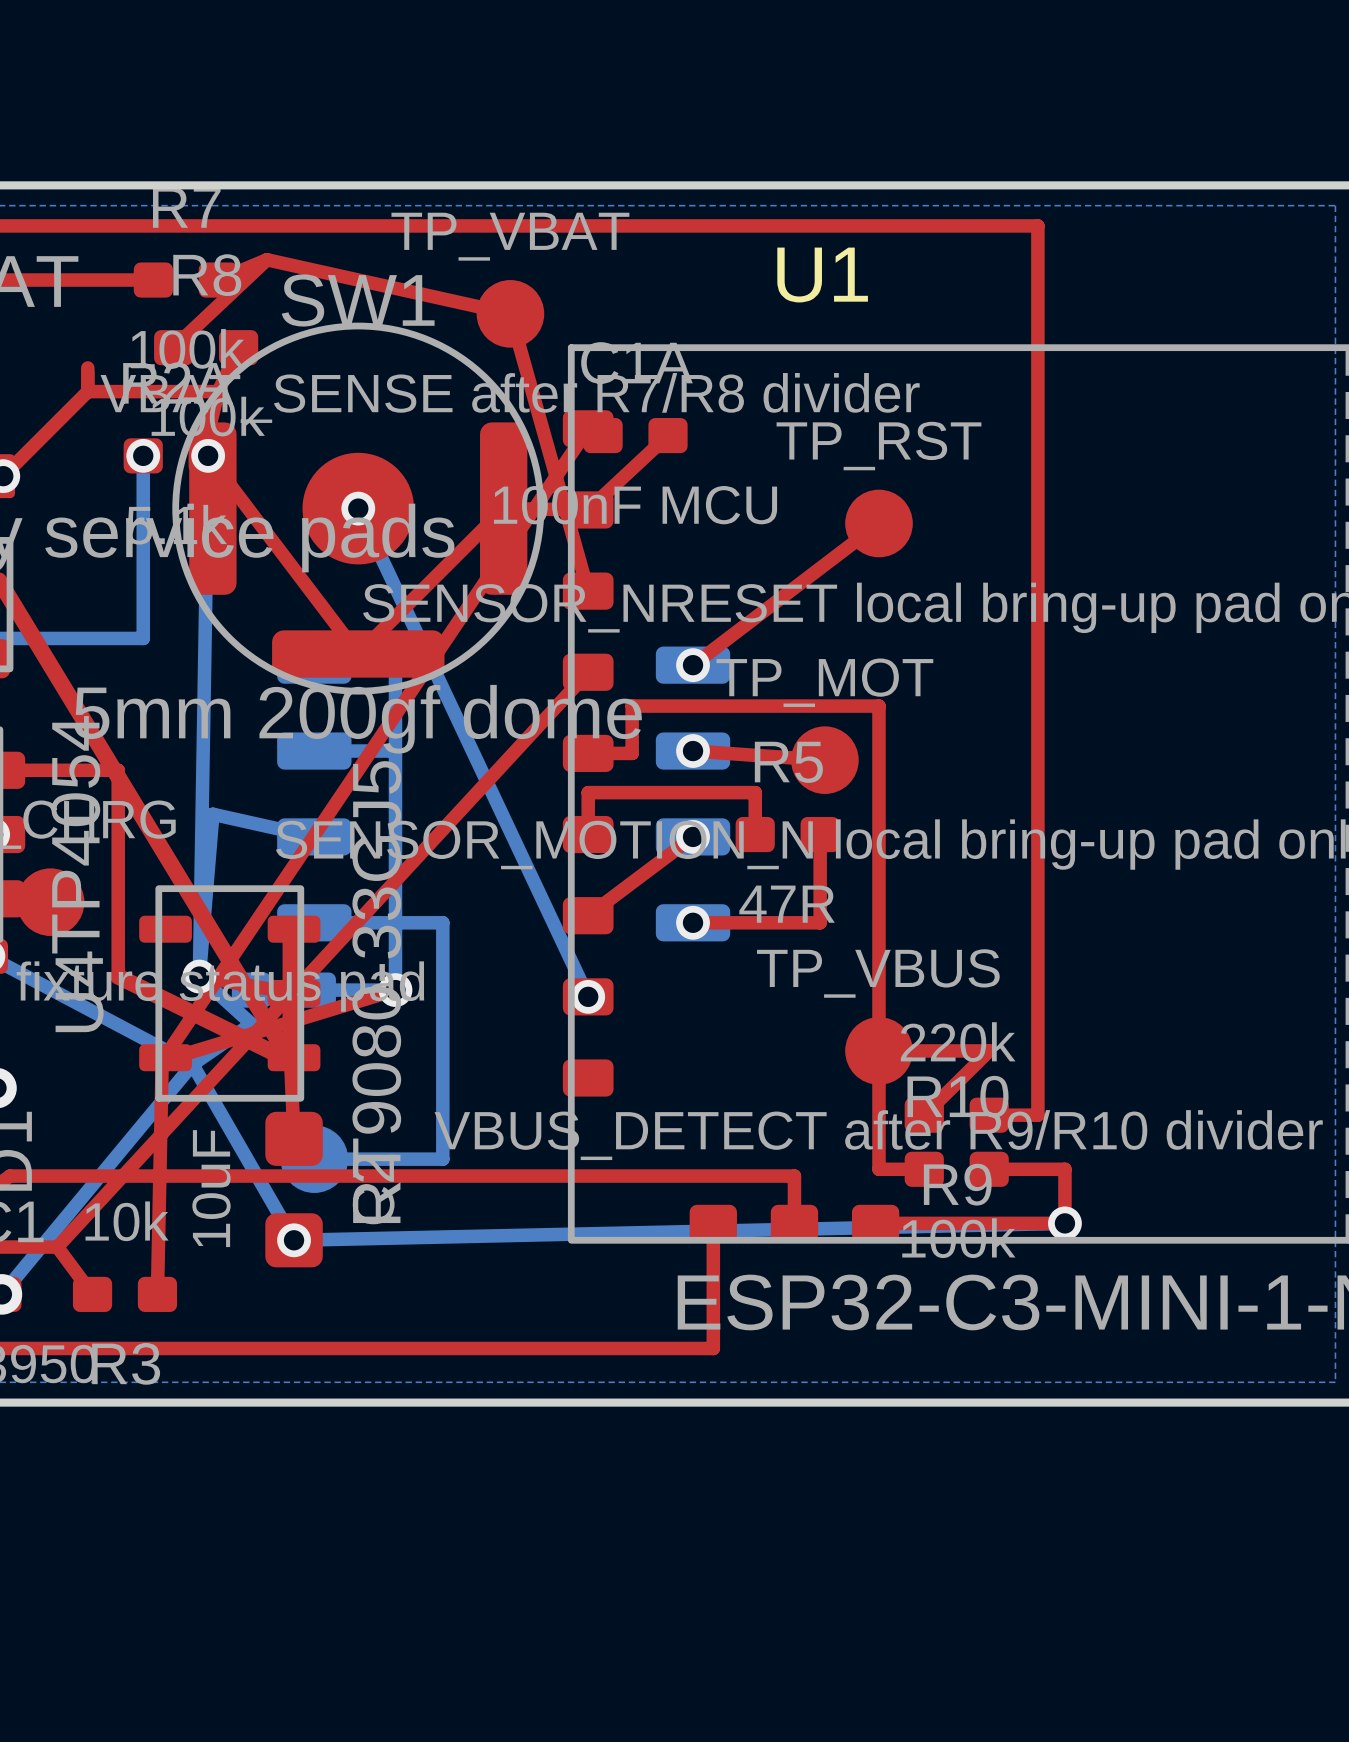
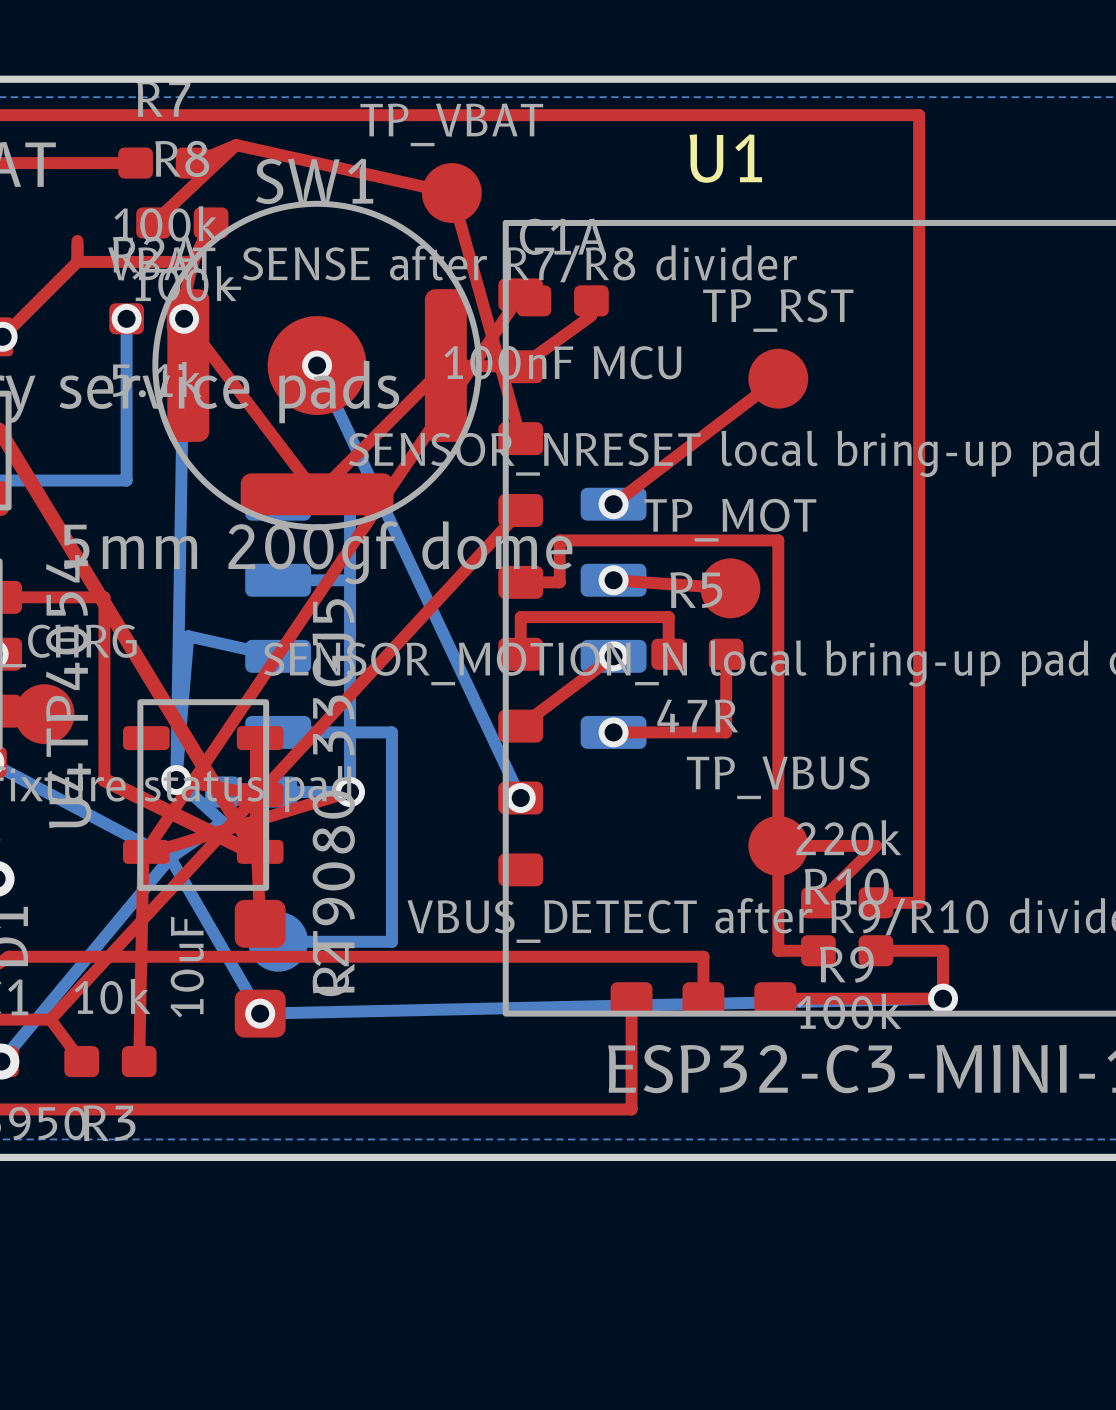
top track: (668, 435) (588, 509) -> (591, 315) (520, 366)

